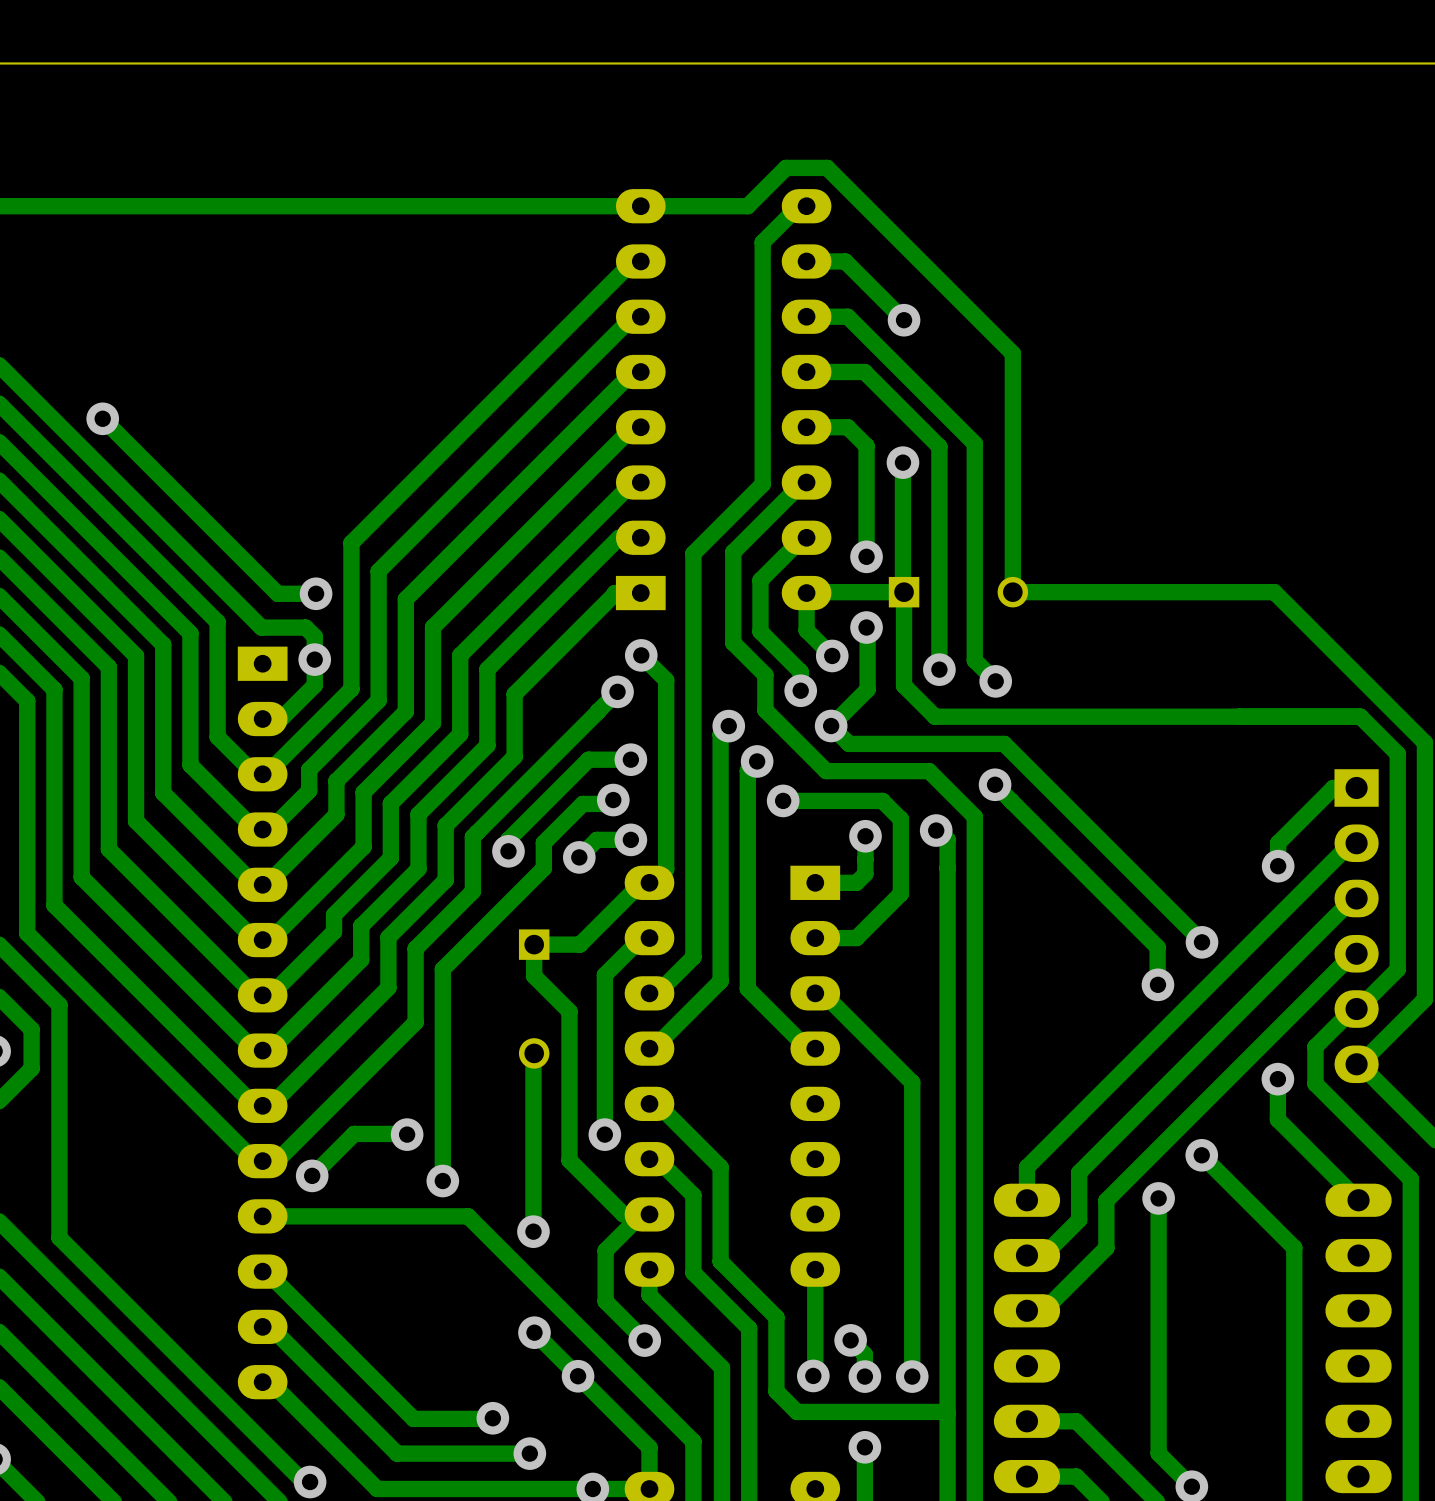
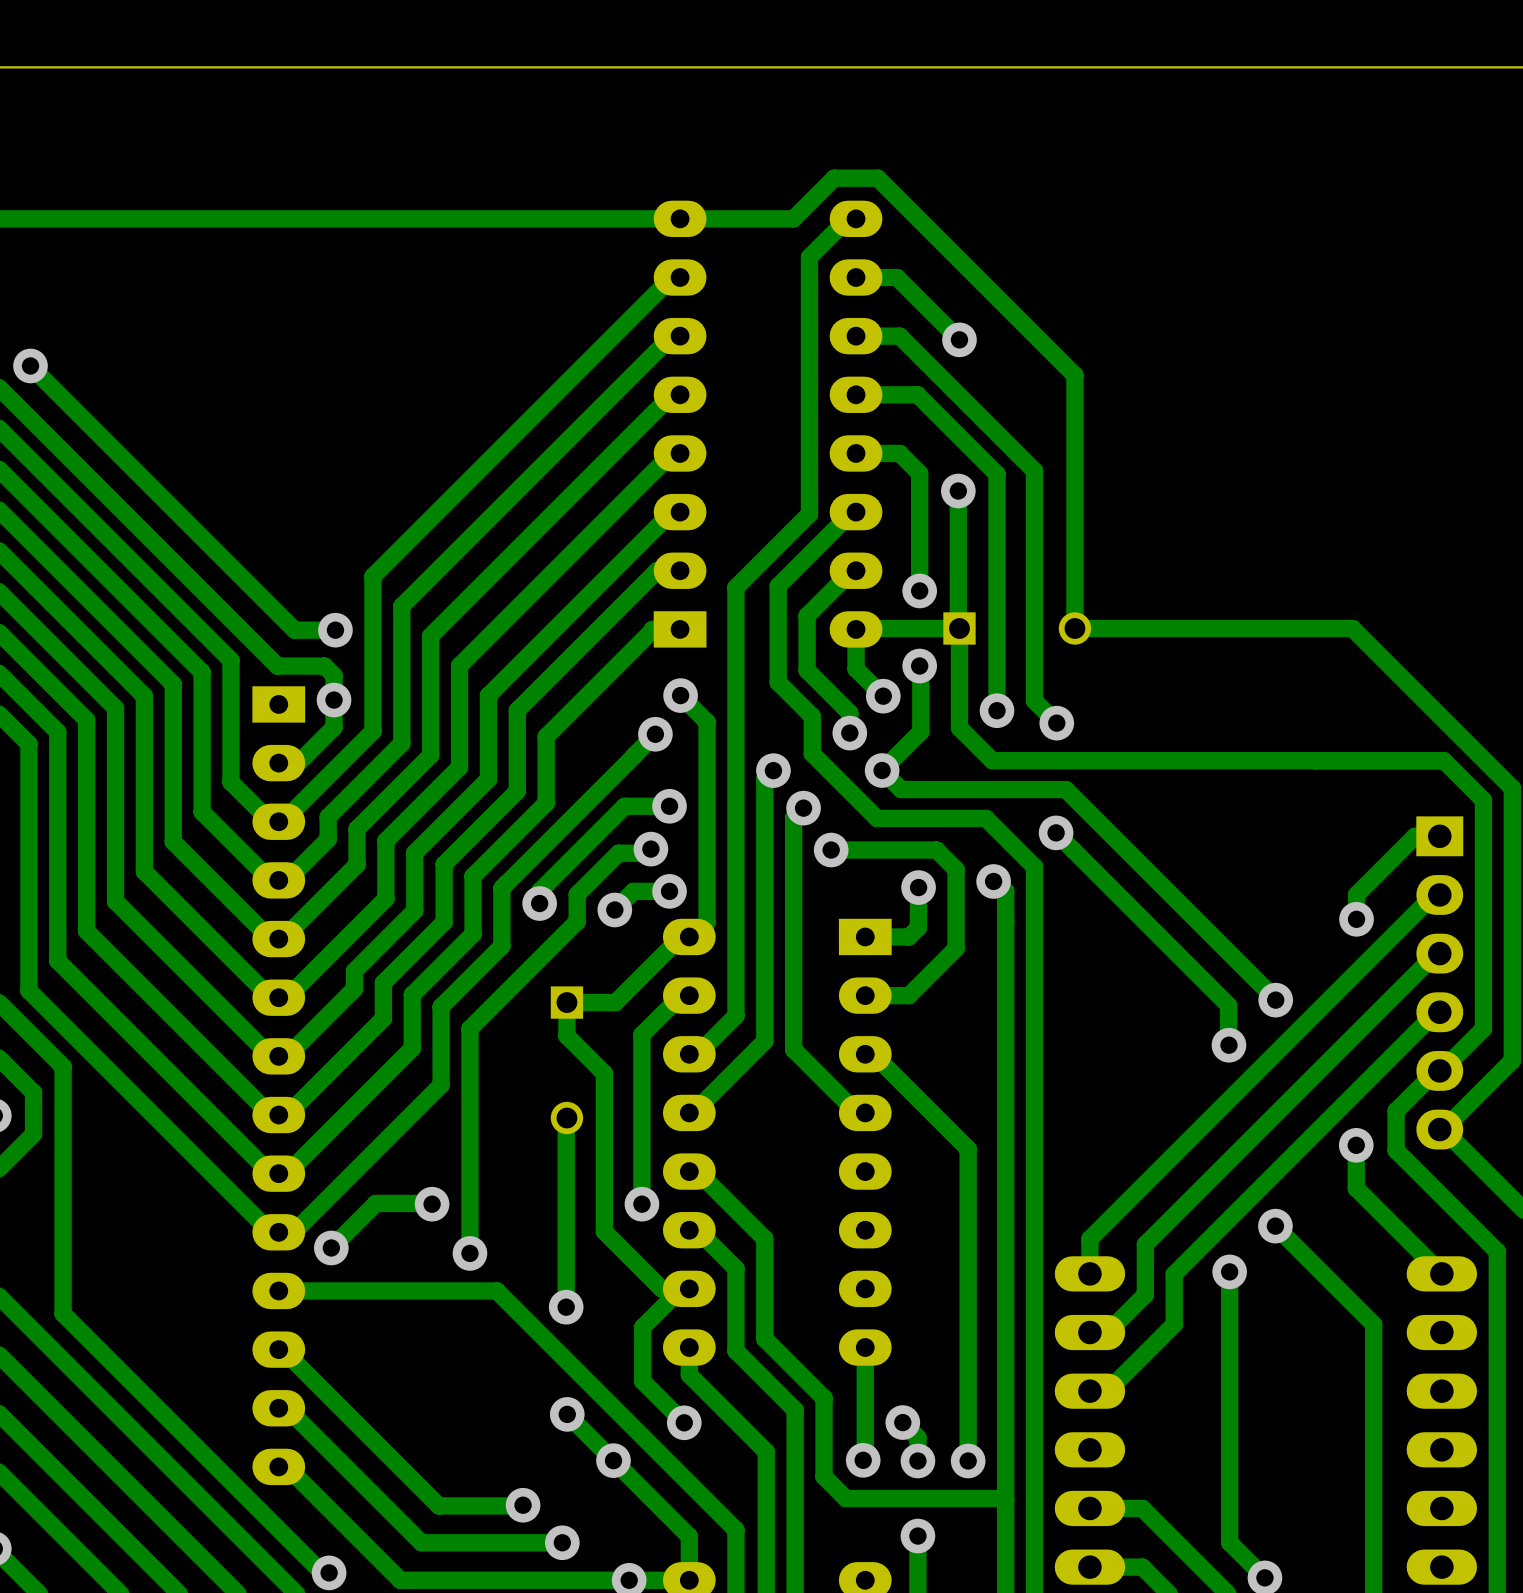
track: none -> (30, 365) (109, 444)
via position: (102, 418) -> (30, 365)

